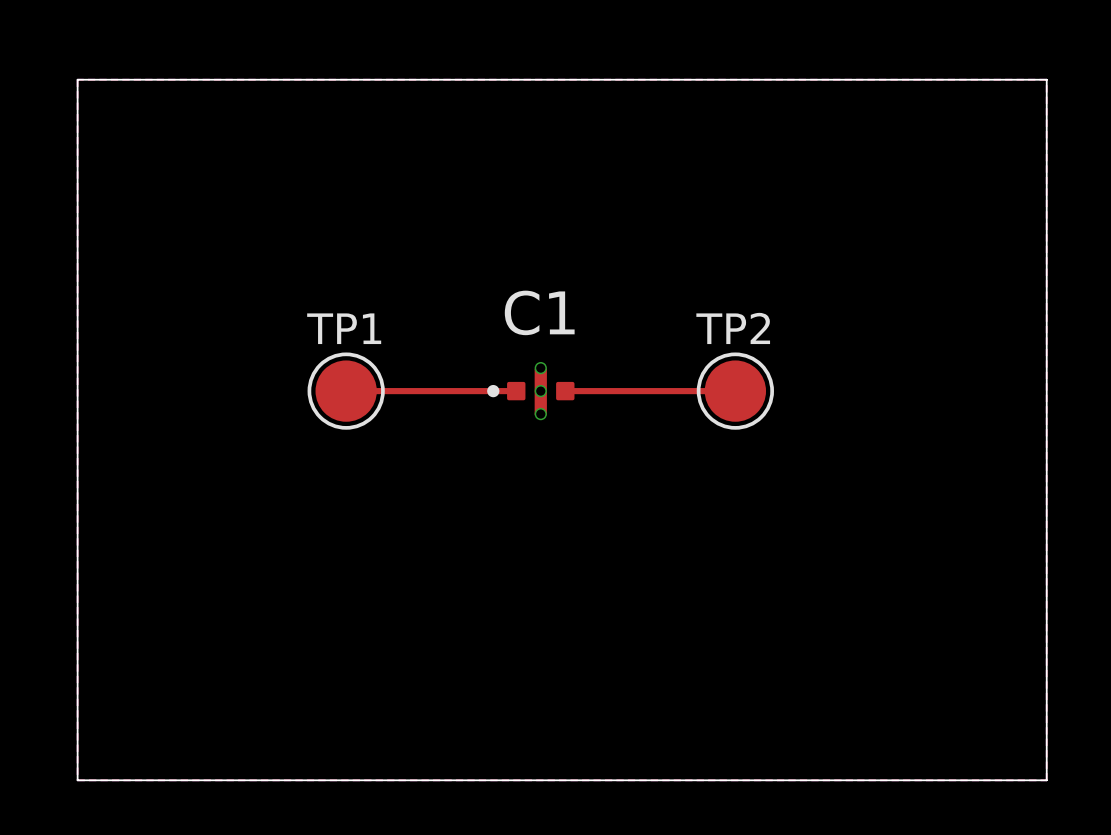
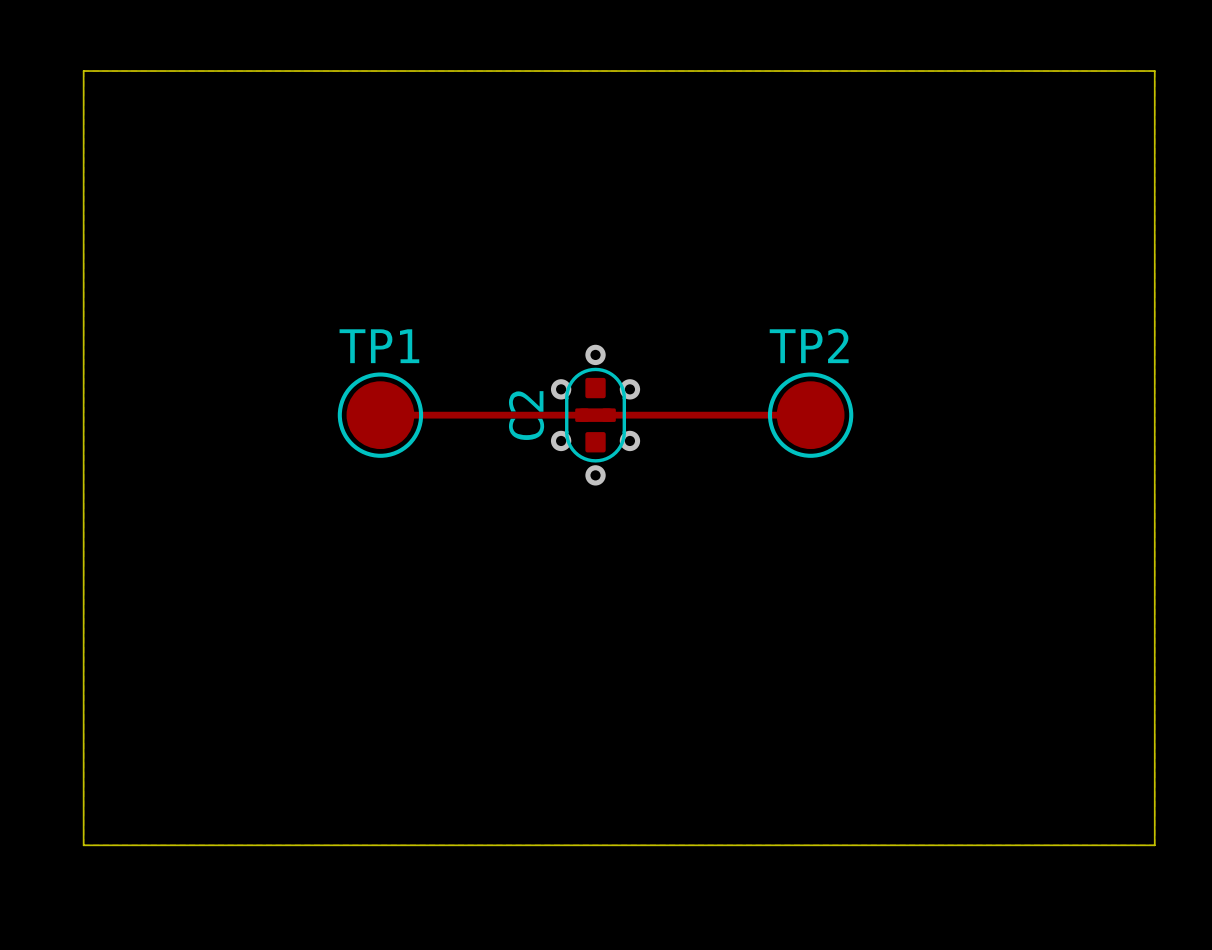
via: none -> (595, 354)
via: none -> (561, 389)
via: none -> (629, 389)
top track: none -> (568, 415) (622, 415)
C1: (530, 391) -> none
C2: none -> (595, 415)
via: none -> (561, 440)
via: none -> (629, 440)
via: none -> (595, 475)

